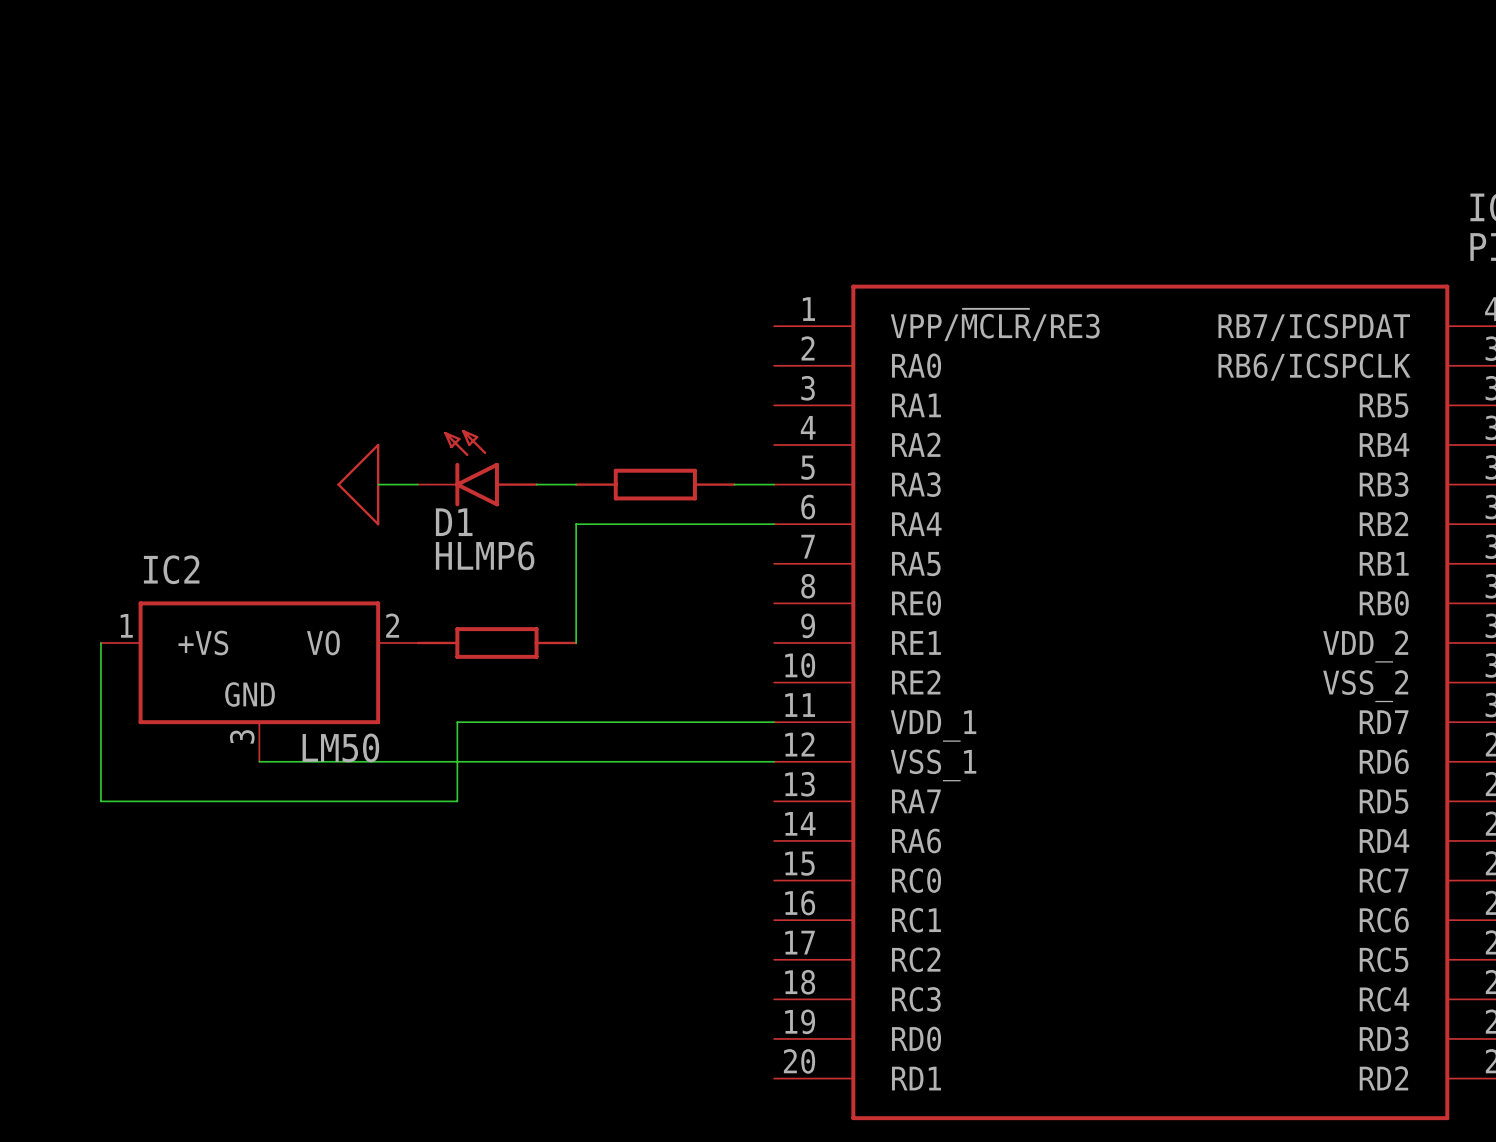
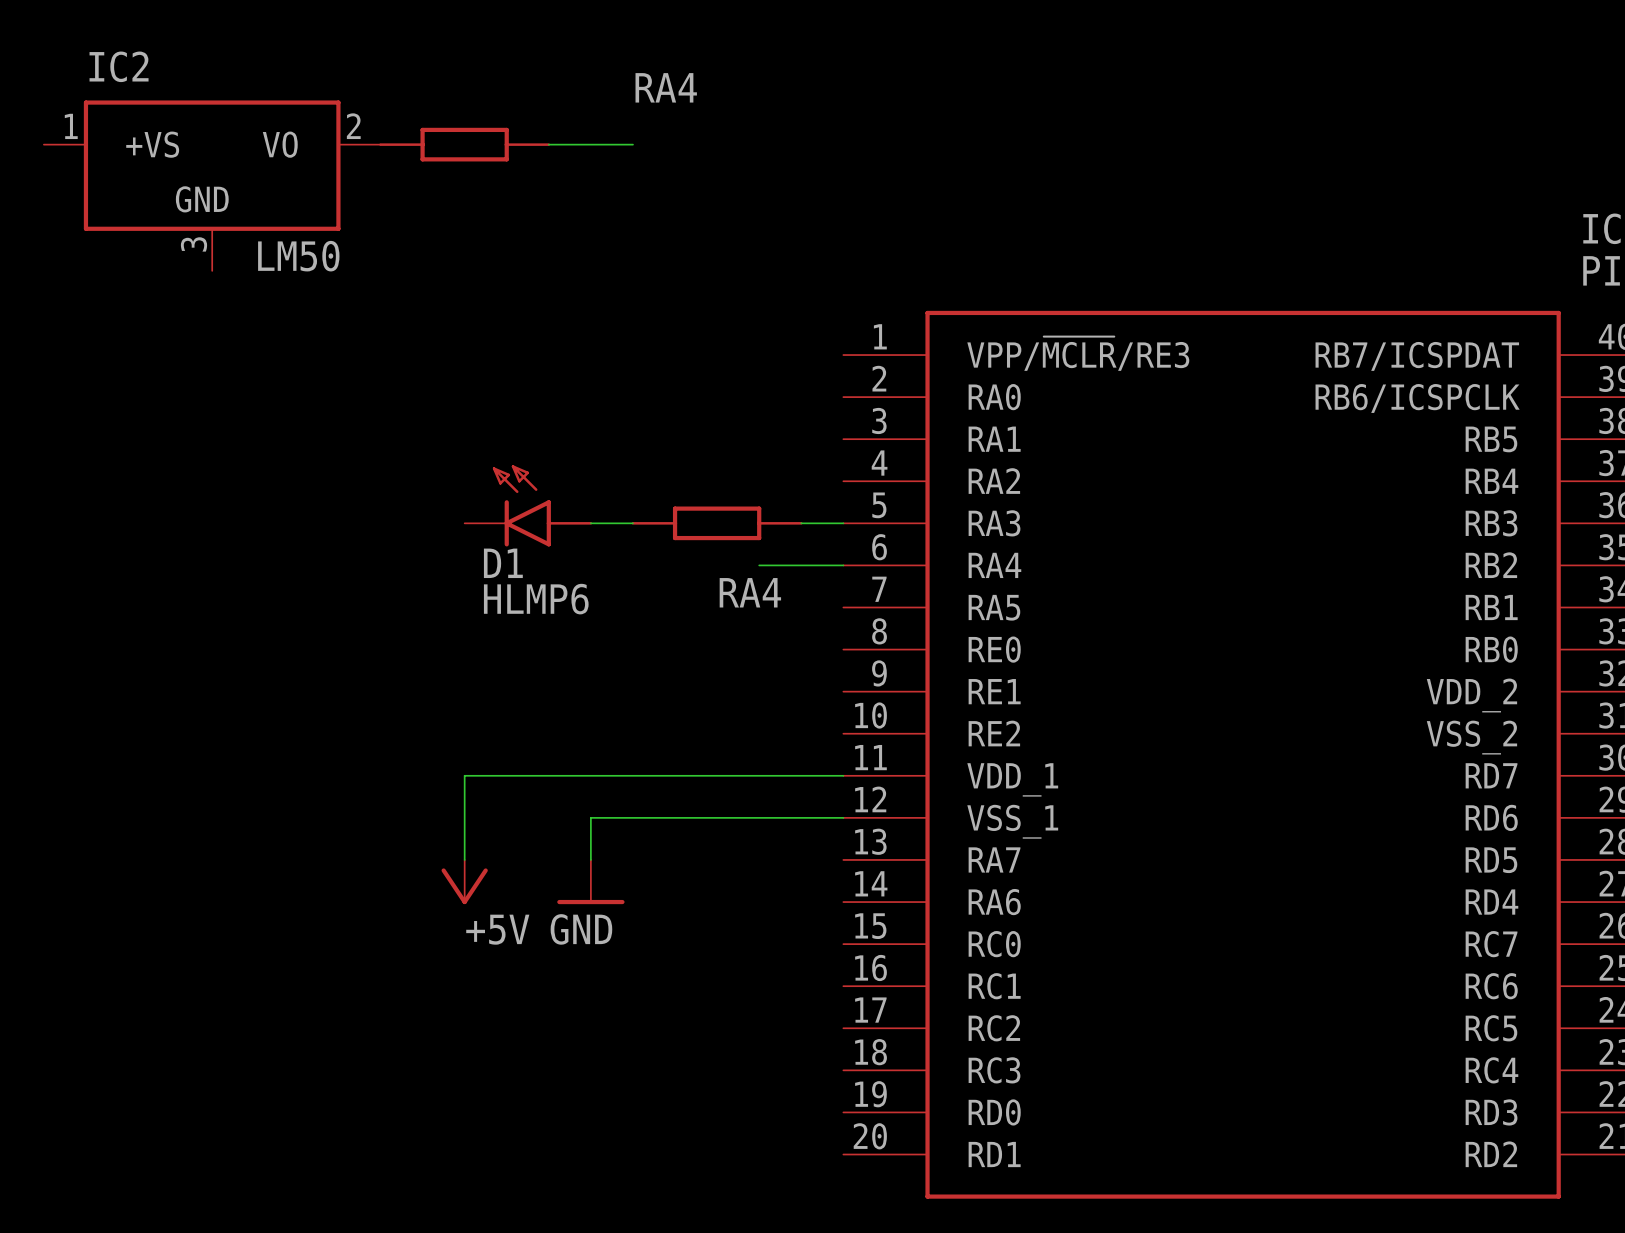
label: none -> RA4 (666, 87)
part: none -> (464, 144)
wire: none -> (548, 144) (632, 144)
power symbol: (358, 484) -> none
wire: (378, 484) (417, 484) -> none
wire: (694, 524) (576, 524) (576, 642) -> none
label: none -> RA4 (750, 592)
wire: (100, 642) (100, 801) (457, 801) (457, 722) -> (464, 859) (464, 775) (506, 775)
part: (496, 642) -> none
IC2 position: (259, 681) -> (212, 185)
wire: (259, 761) (536, 761) -> (590, 859) (590, 817)
power symbol: none -> +5V (464, 882)
power symbol: none -> GND (590, 882)

